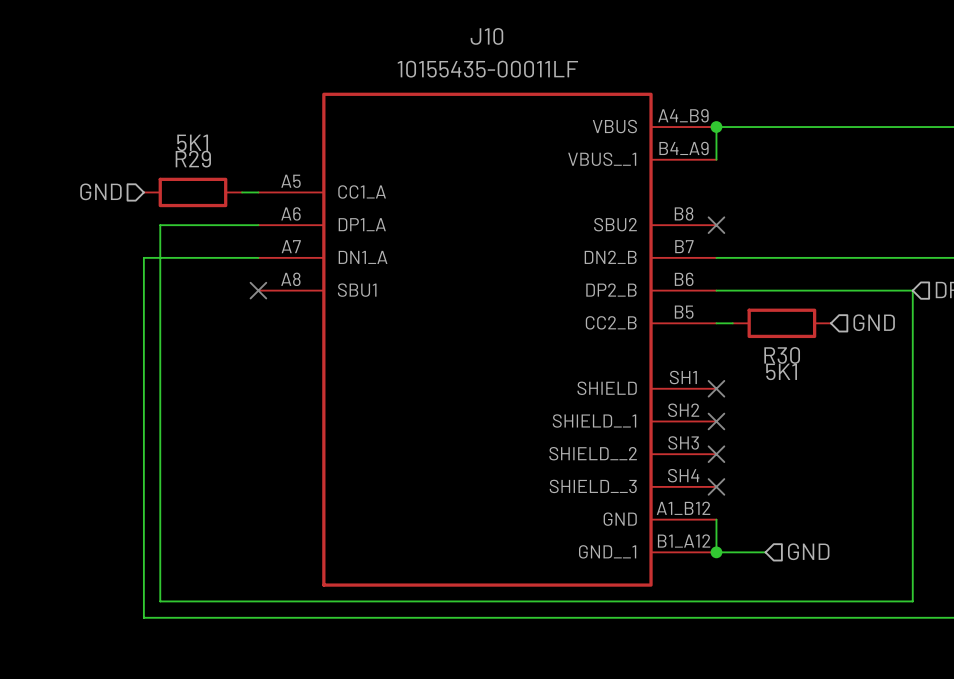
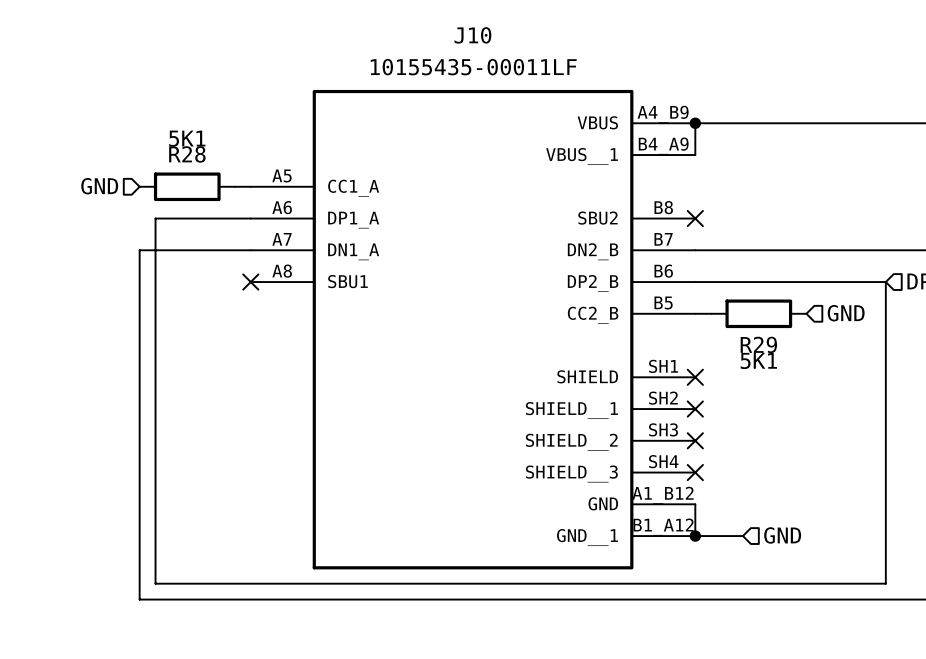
R29 name: R29 (193, 159) -> R28 (187, 154)
R30 name: R30 (782, 355) -> R29 (758, 344)

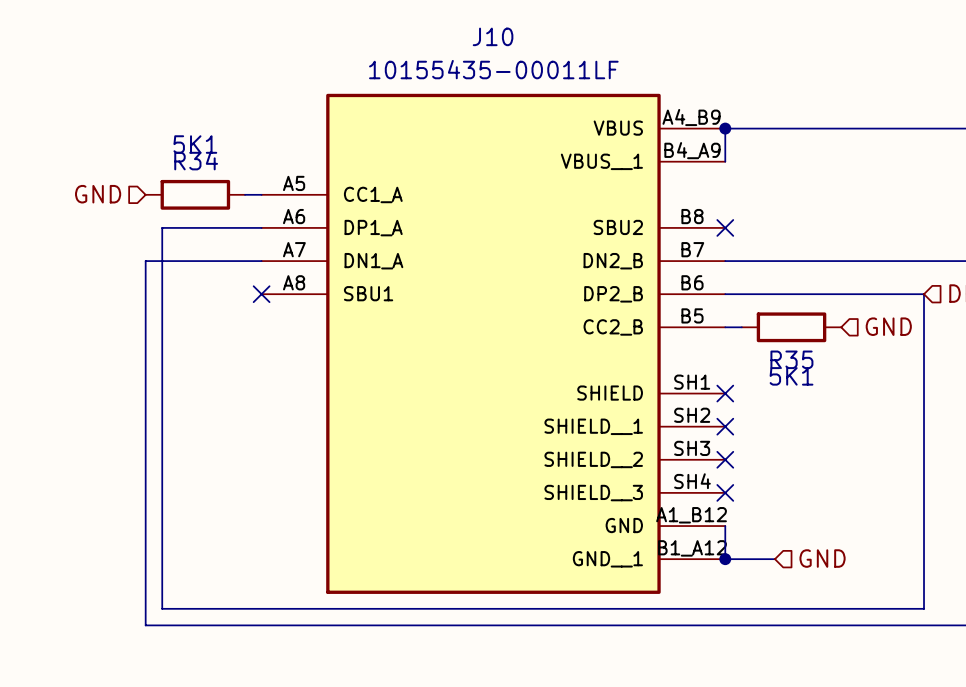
R28 name: R28 (187, 154) -> R34 (196, 160)
R29 name: R29 (758, 344) -> R35 (791, 359)

